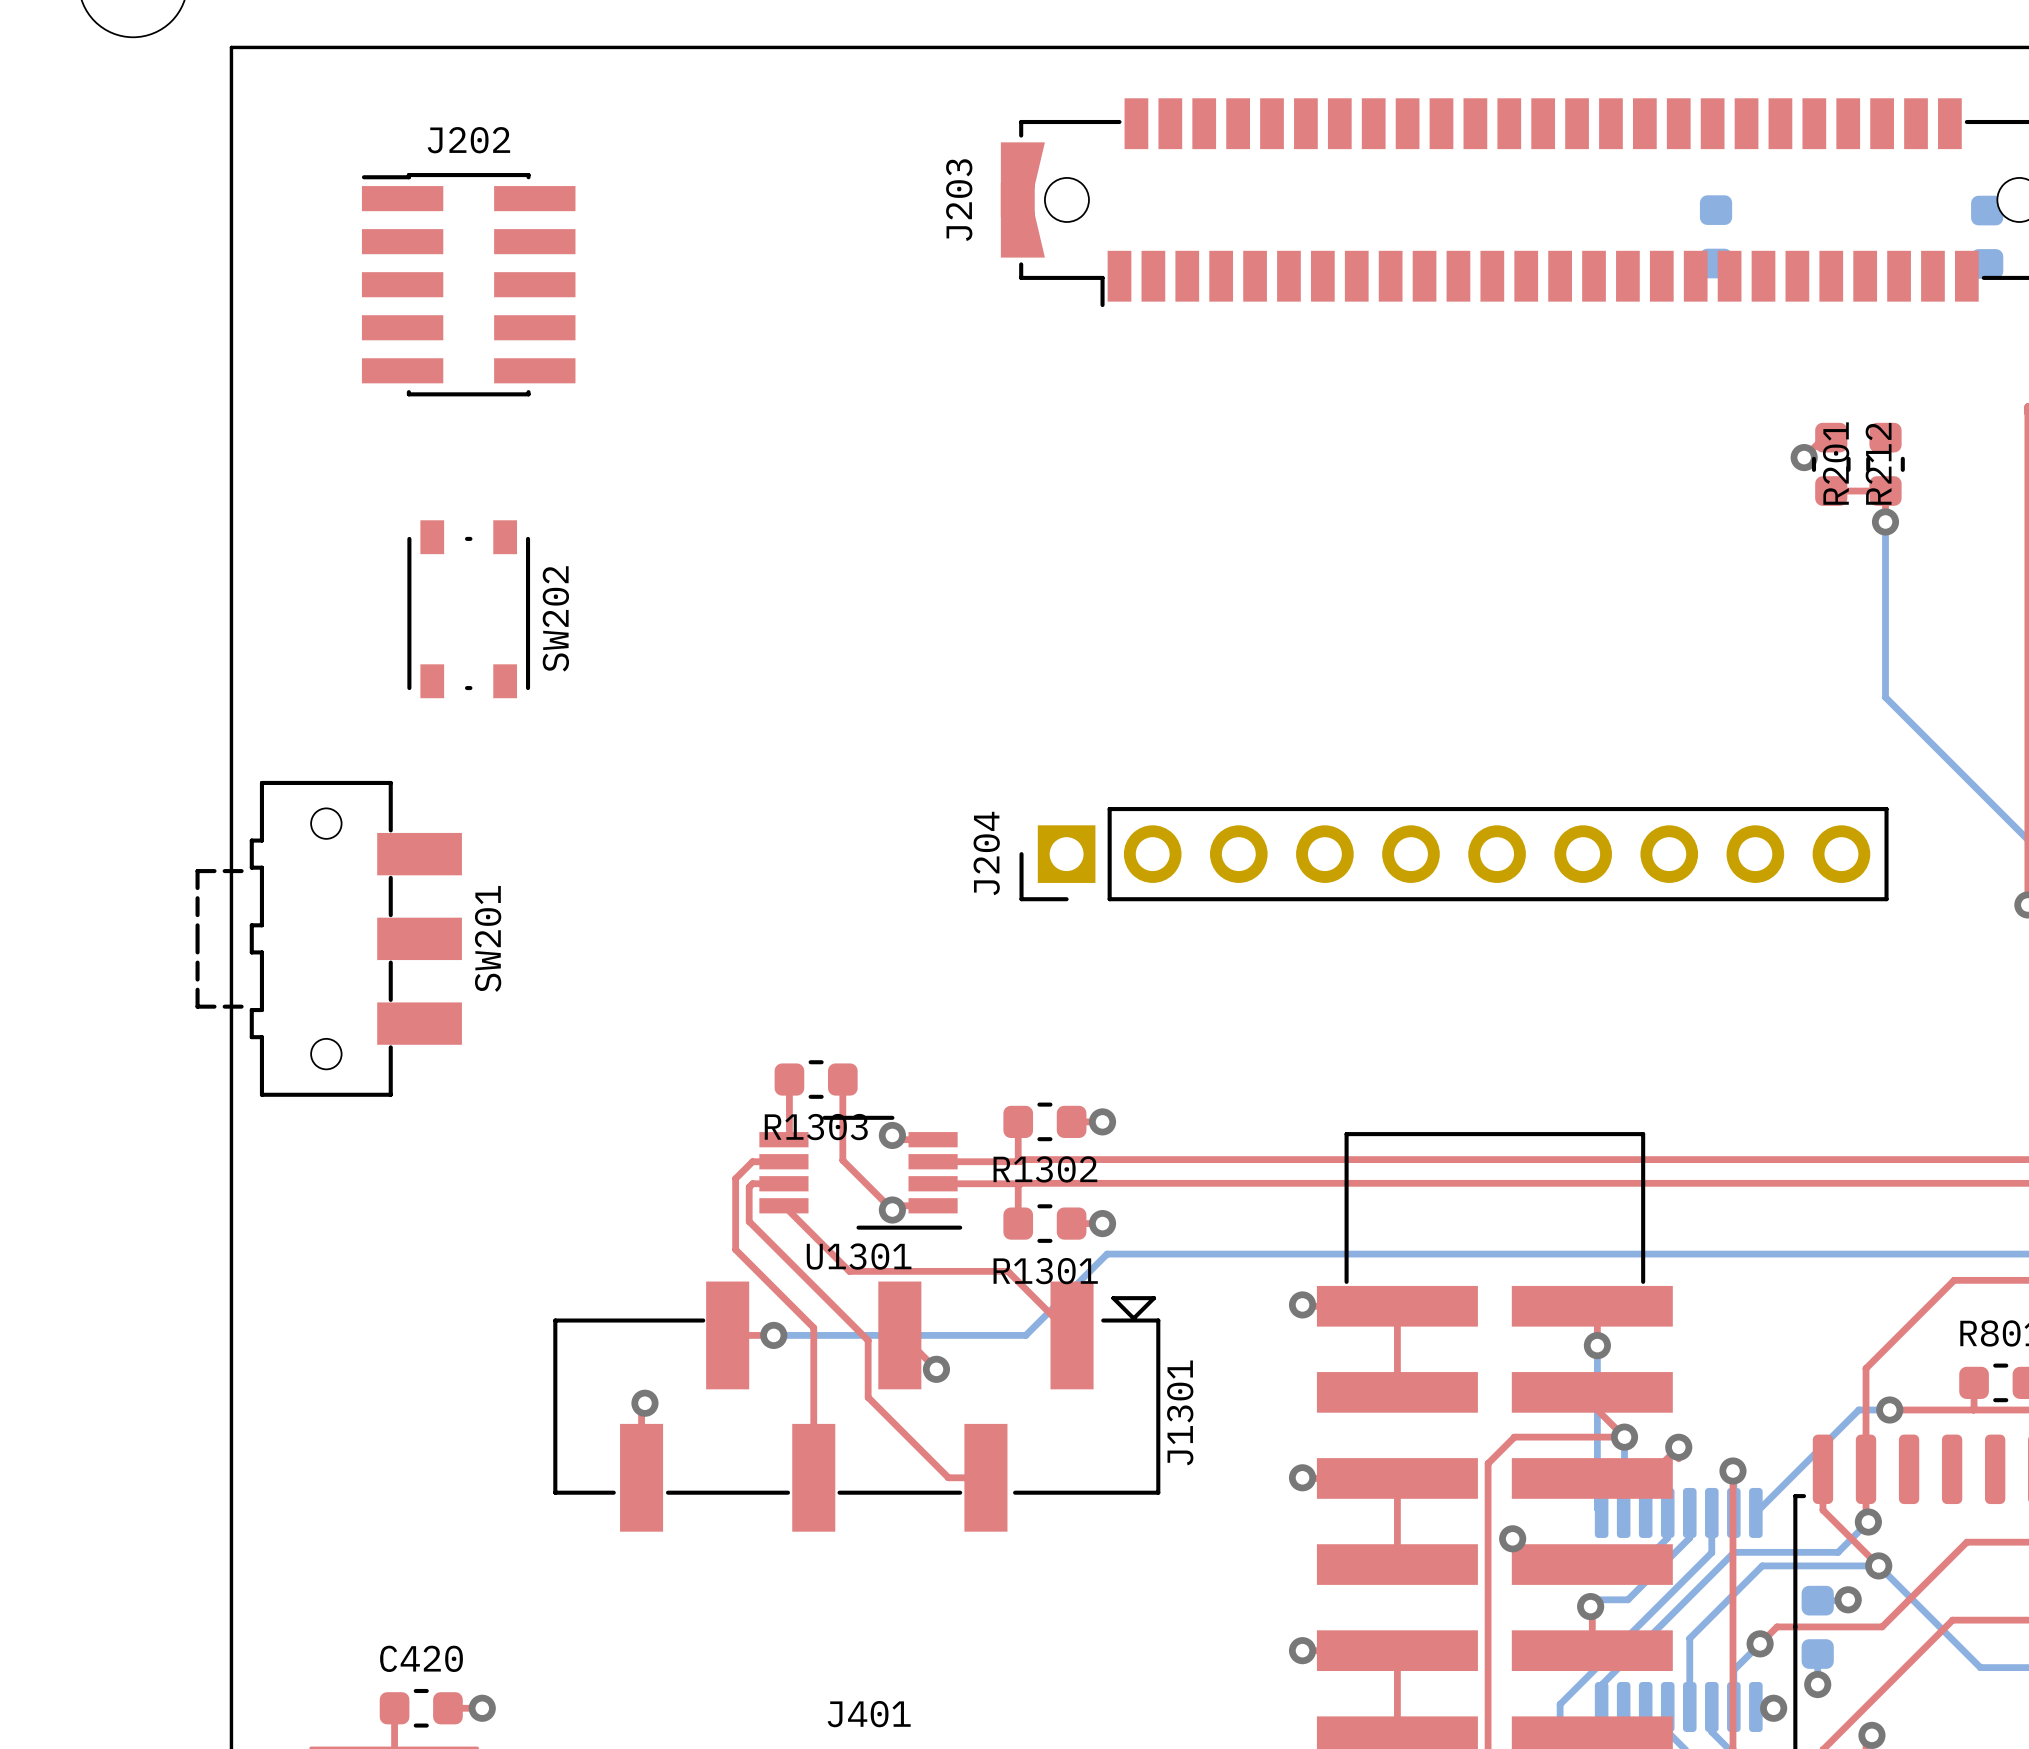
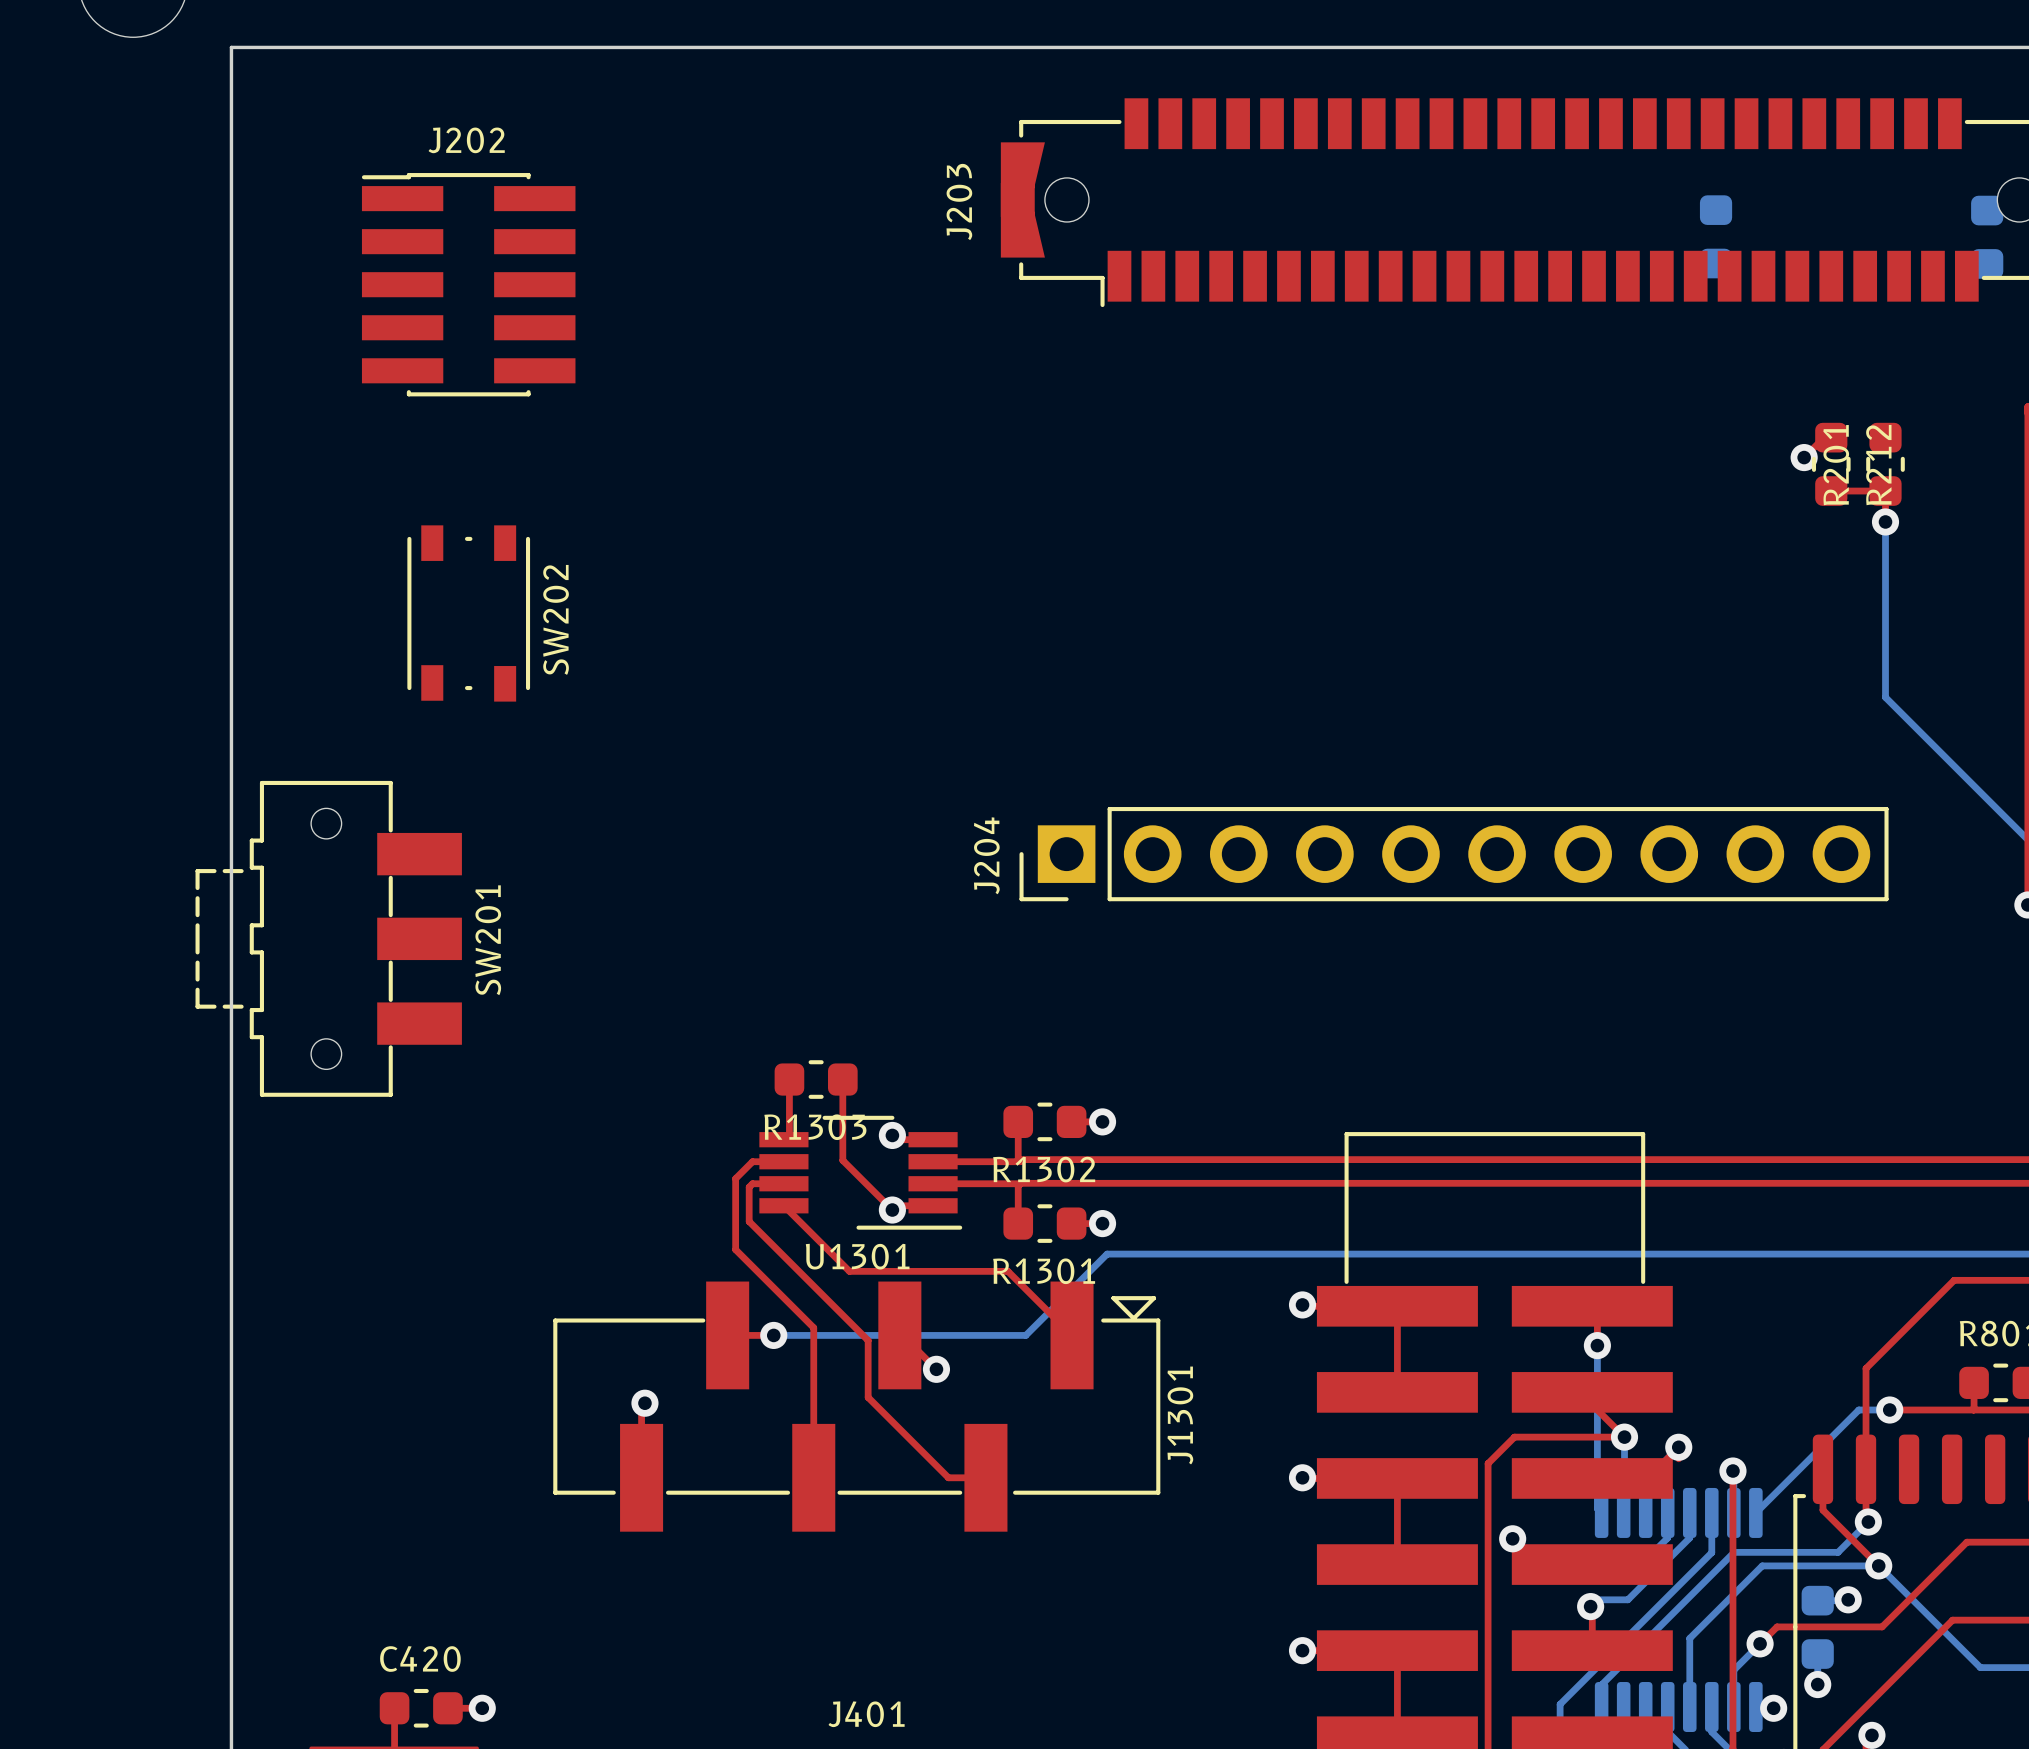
SW202 footprint: [407, 520, 531, 699] -> [407, 525, 531, 702]

